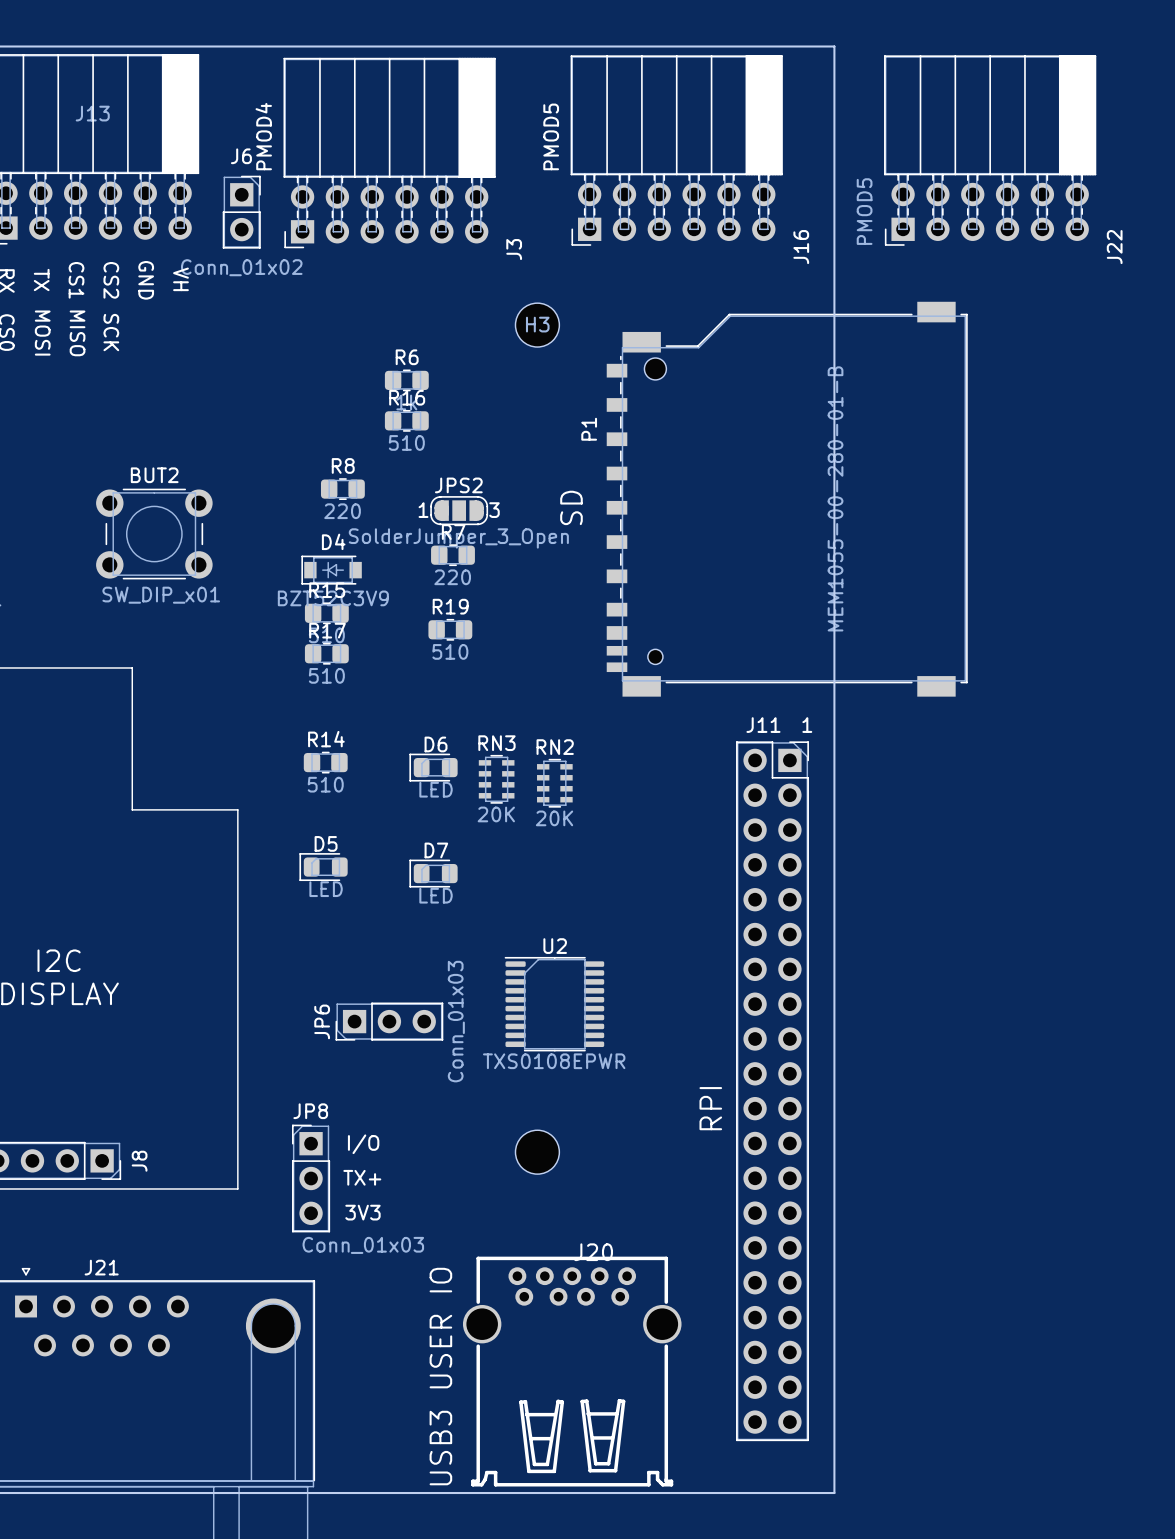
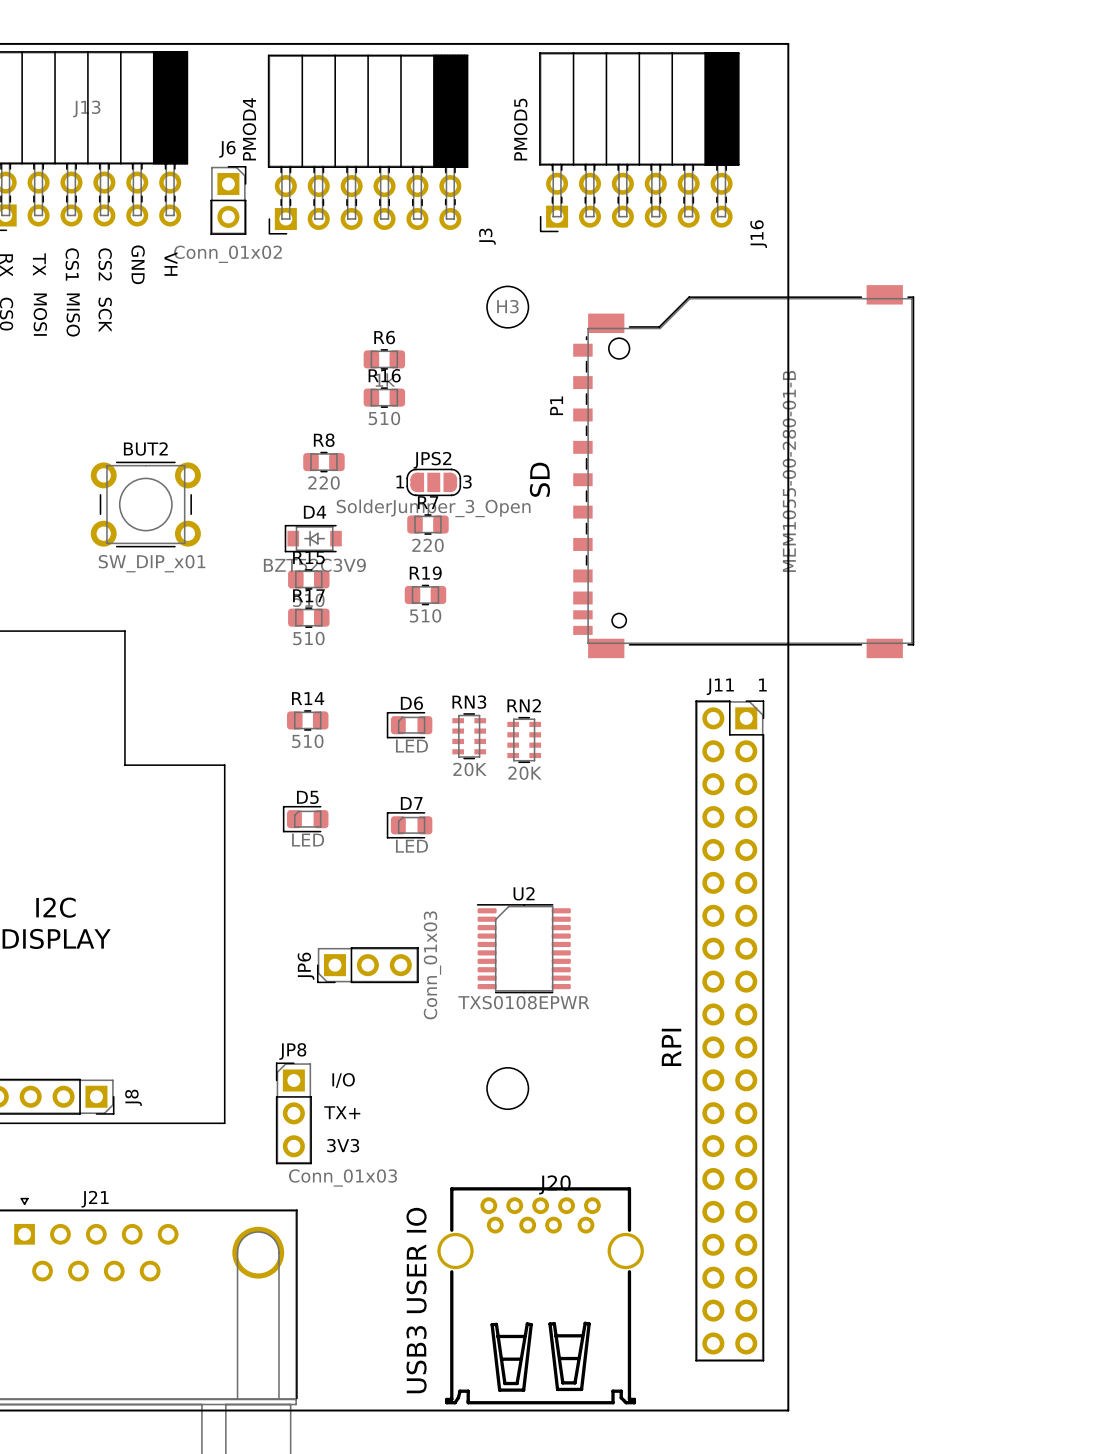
J22: PMOD5 (990, 150) -> none

